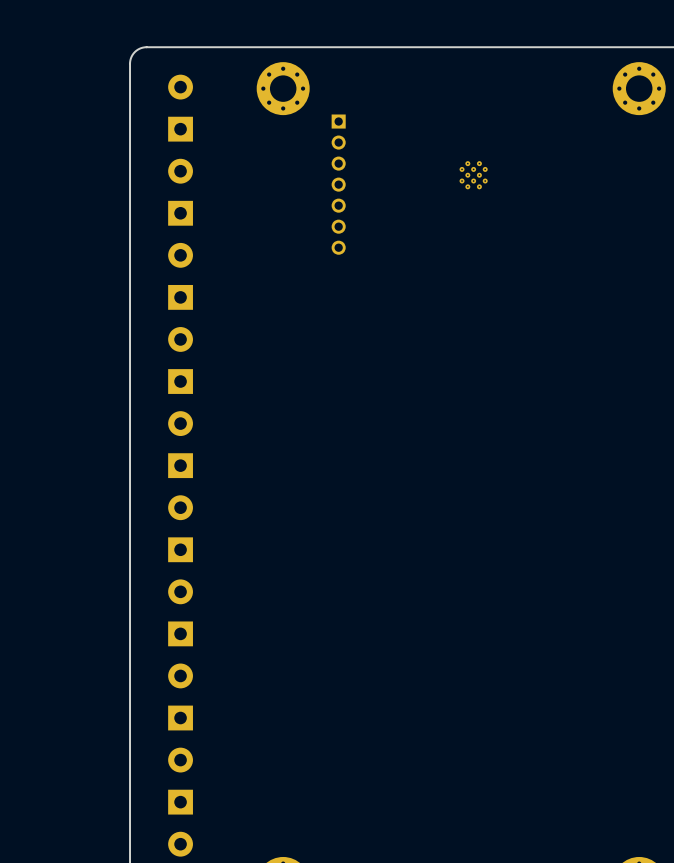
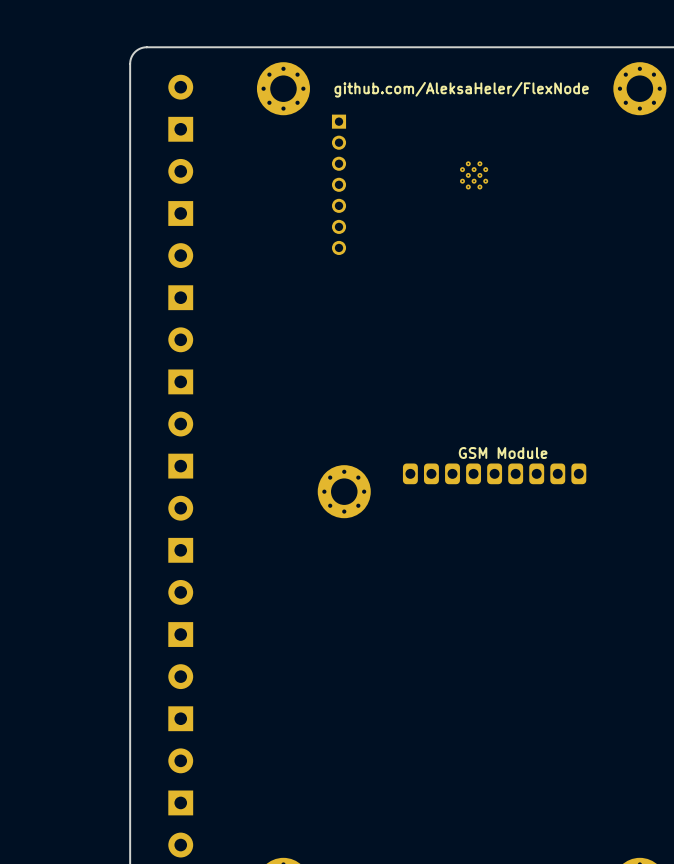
text: none -> github.com/AleksaHeler/FlexNode (461, 89)
text: none -> GSM Module (503, 453)
part: none -> (494, 473)
part: none -> (344, 491)

